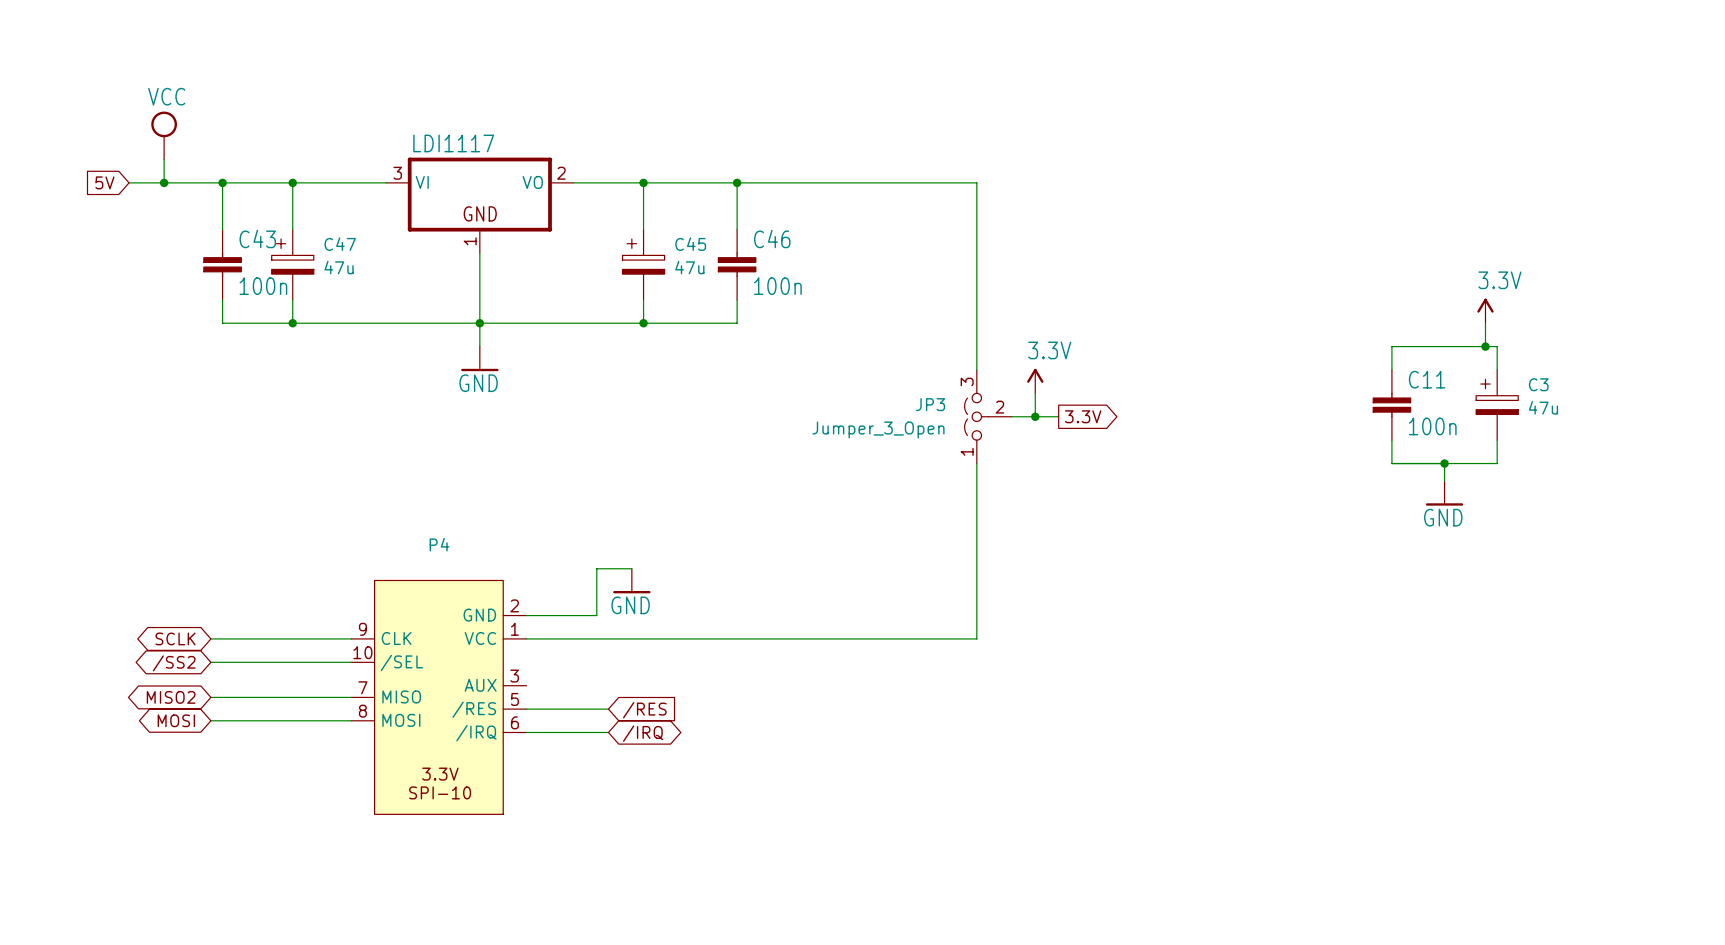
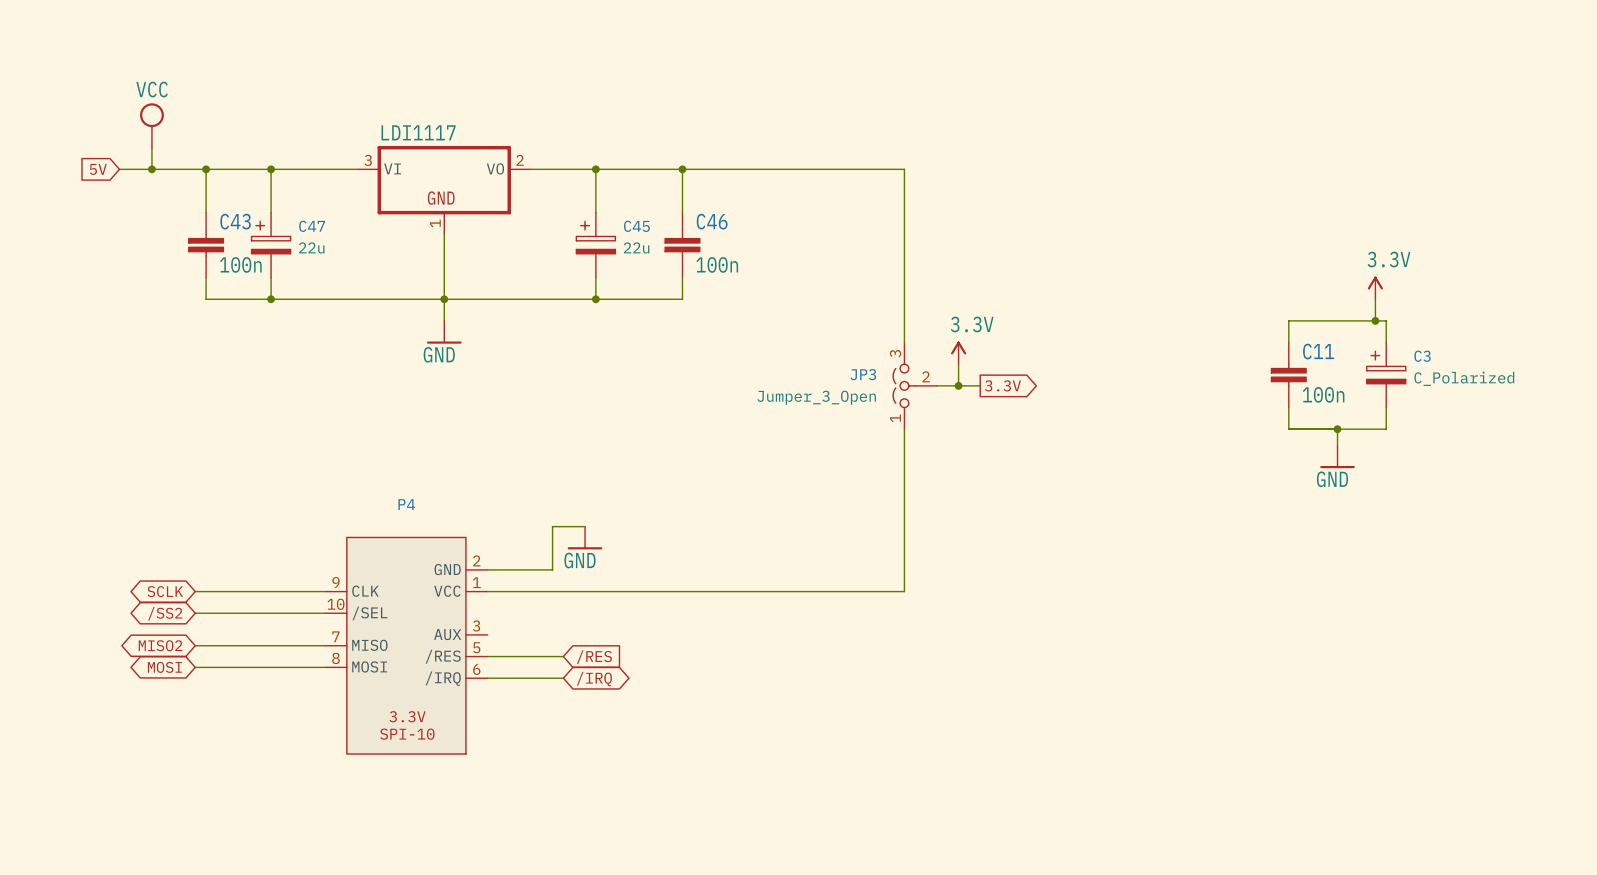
C47 value: 47u (339, 267) -> 22u (311, 247)
C45 value: 47u (689, 267) -> 22u (636, 247)
C3 value: 47u (1543, 407) -> C_Polarized (1464, 378)

